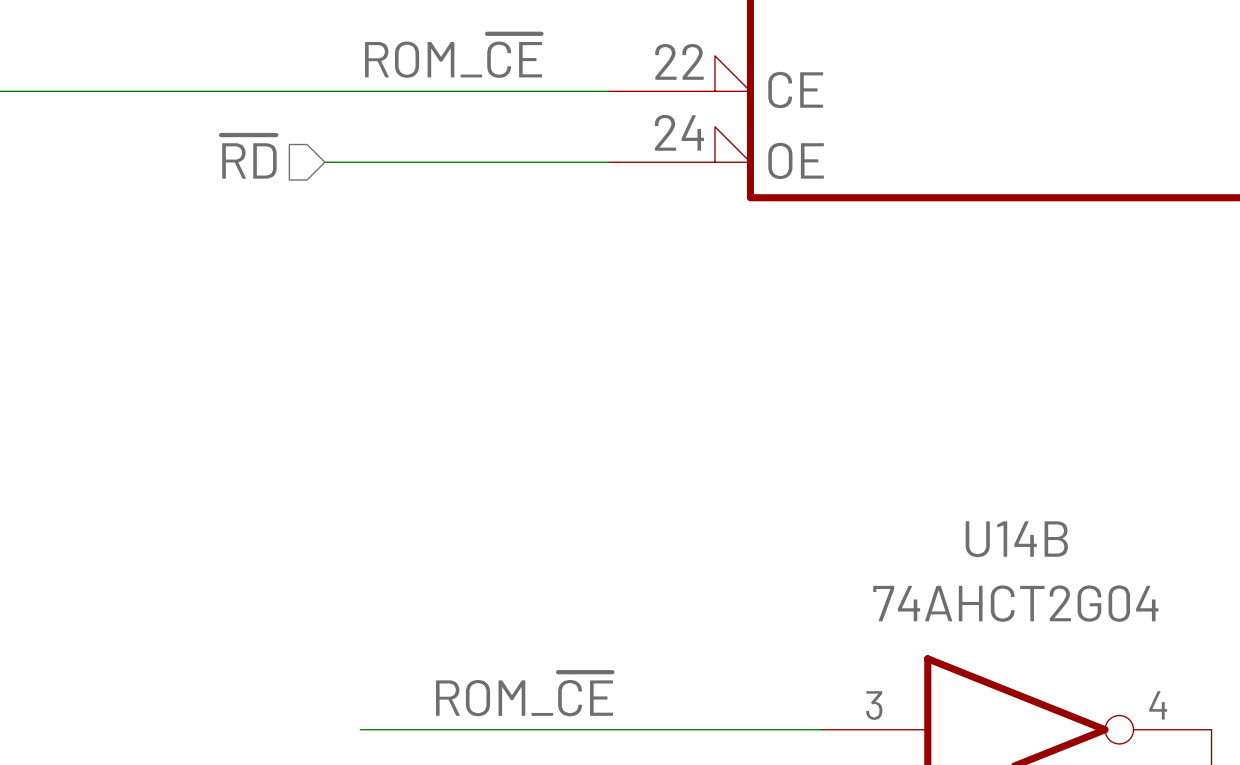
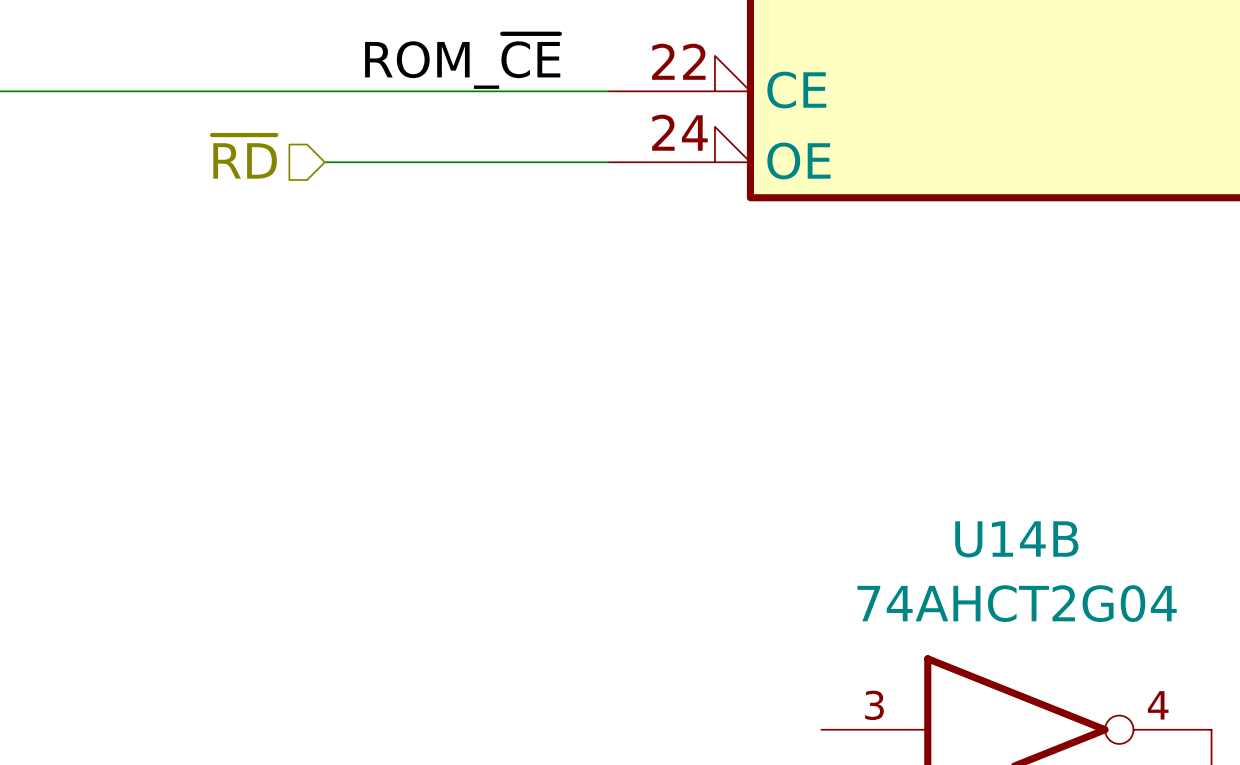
label: ROM_~{CE} (524, 694) -> none
wire: (360, 729) (821, 729) -> none

